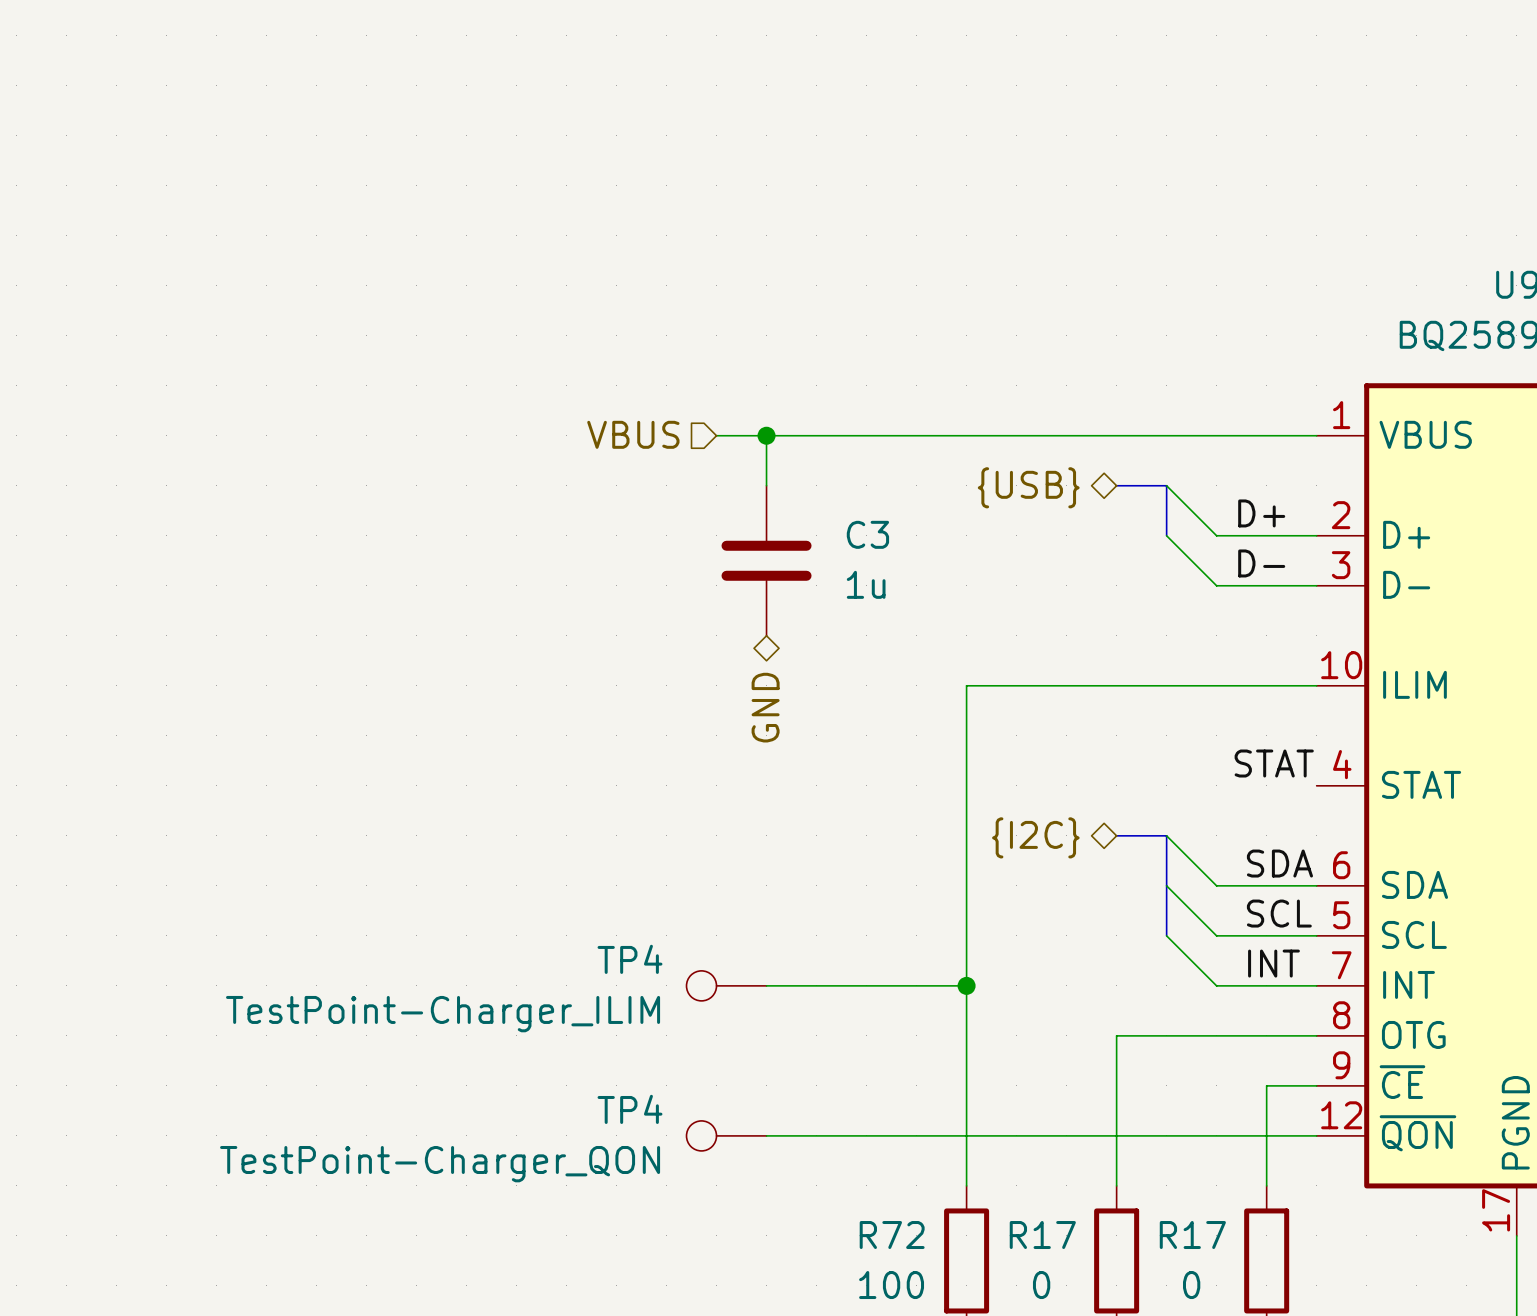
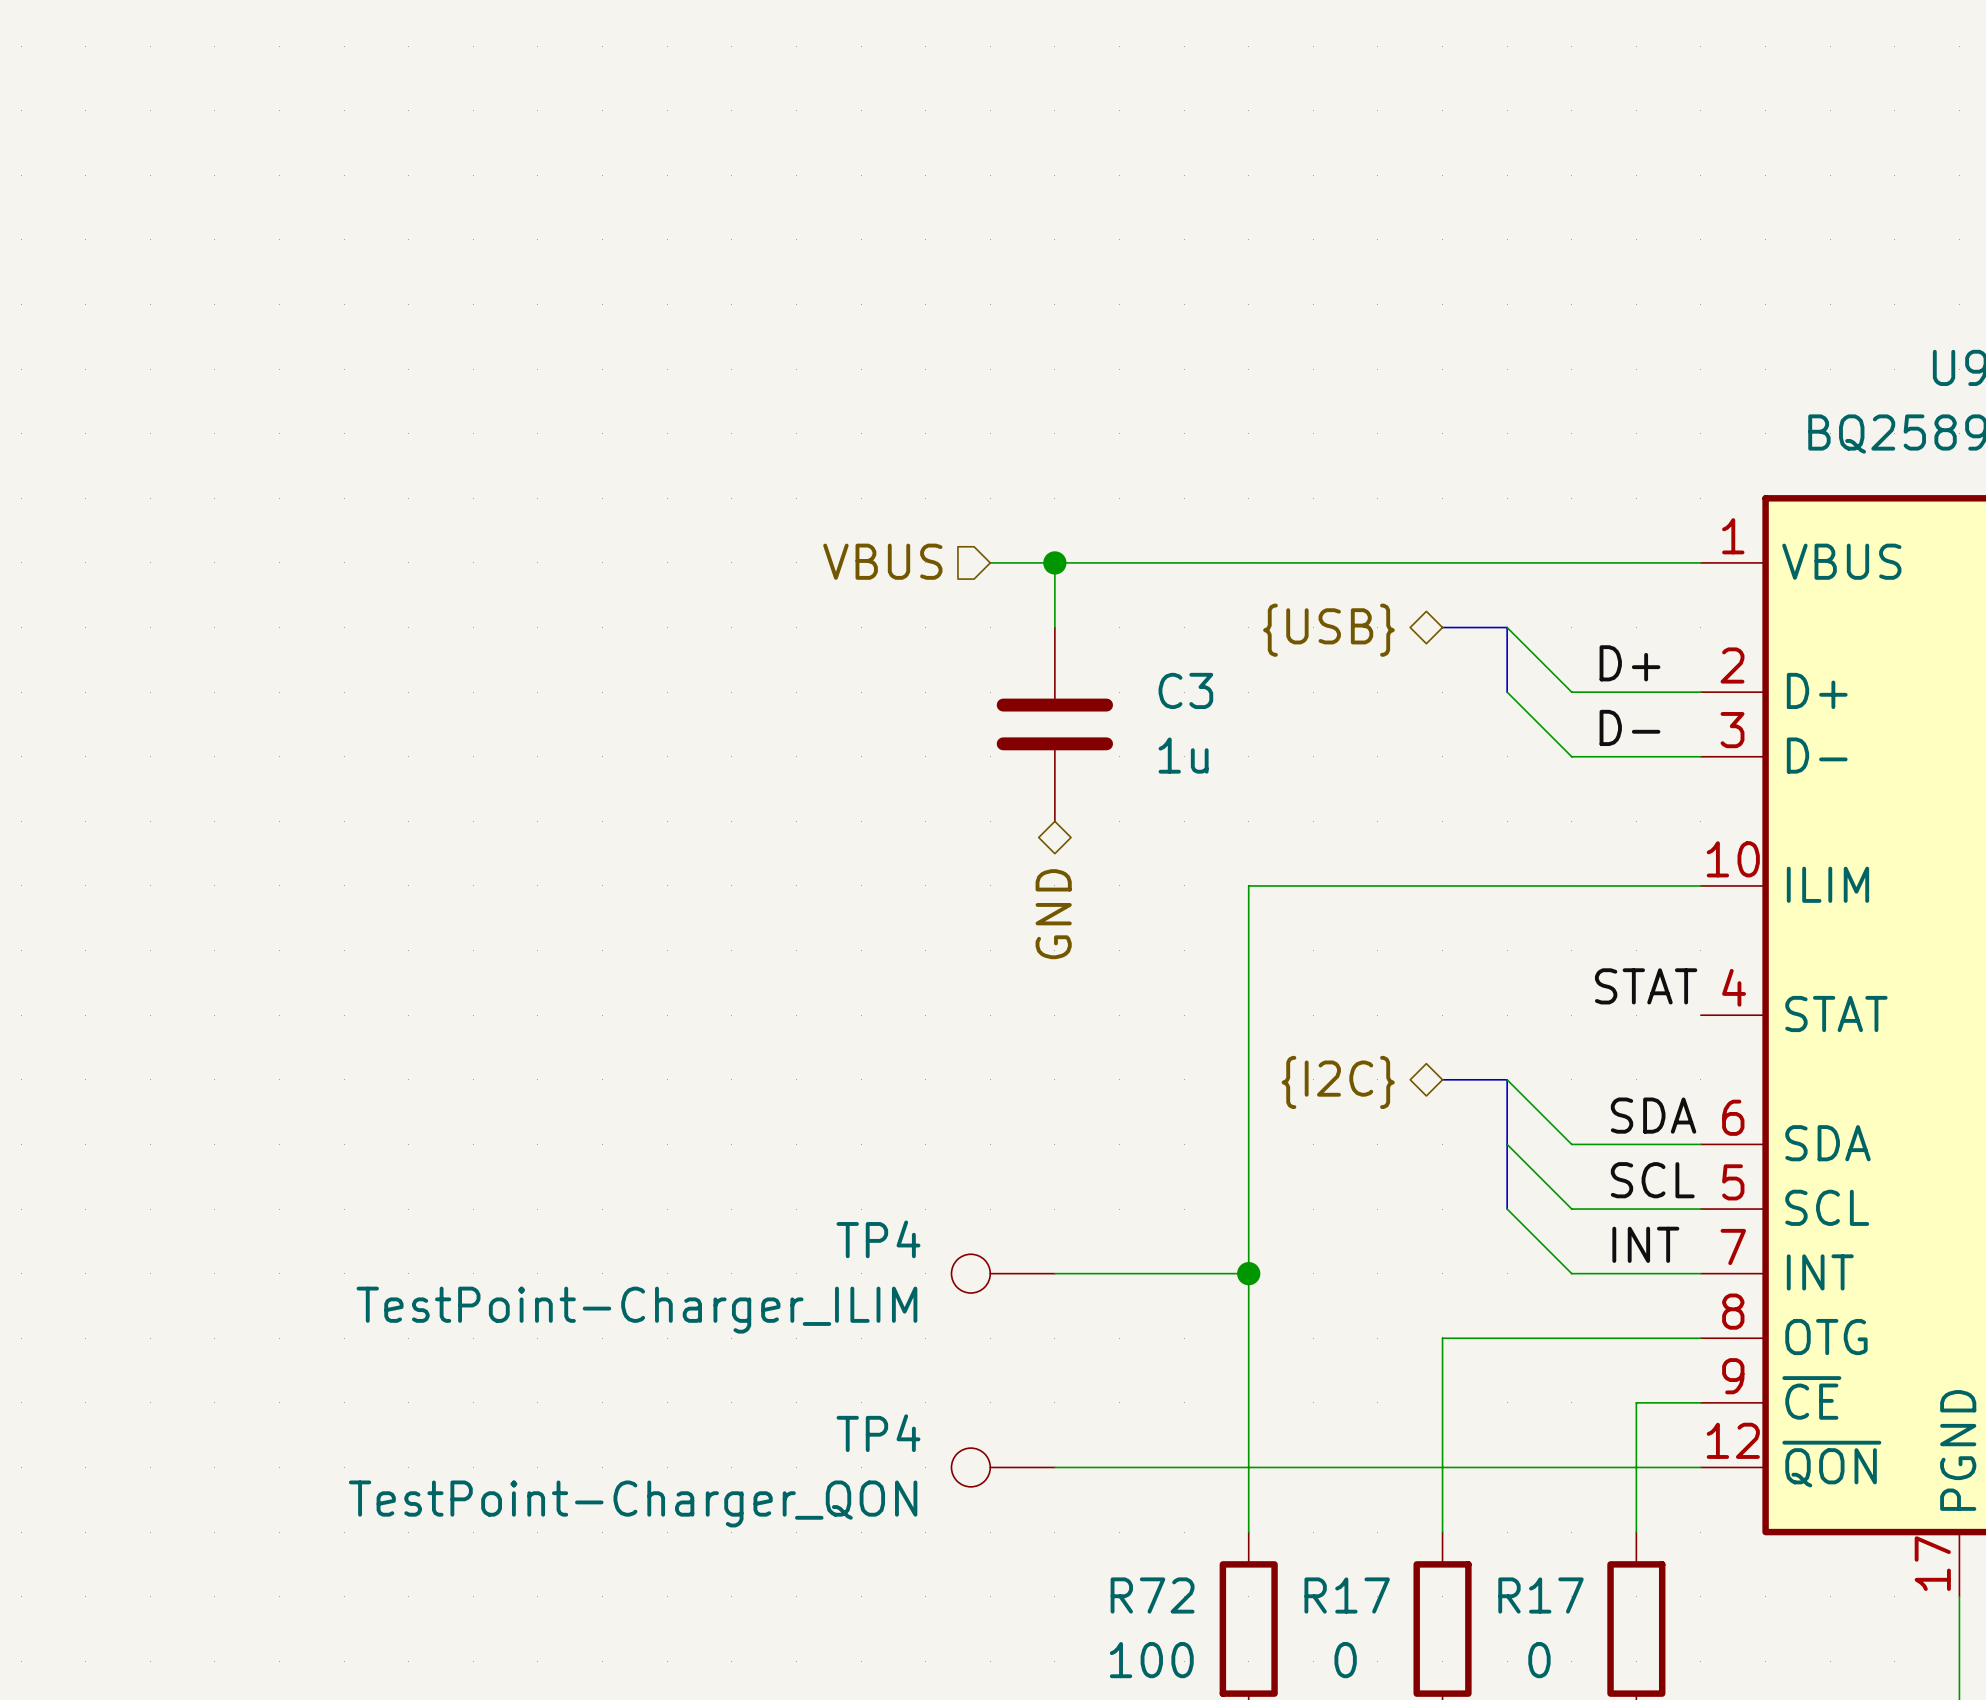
hierarchical label position: VBUS (633, 434) -> VBUS (882, 561)
wire: (716, 435) (766, 435) (766, 485) -> none
junction position: (766, 435) -> (1054, 562)
wire: none -> (1054, 562) (1054, 627)
C3 position: (766, 560) -> (1054, 724)
hierarchical label position: GND (765, 707) -> GND (1053, 914)
TP4 position: (726, 985) -> (1003, 1273)
TP4 position: (726, 1135) -> (1003, 1467)

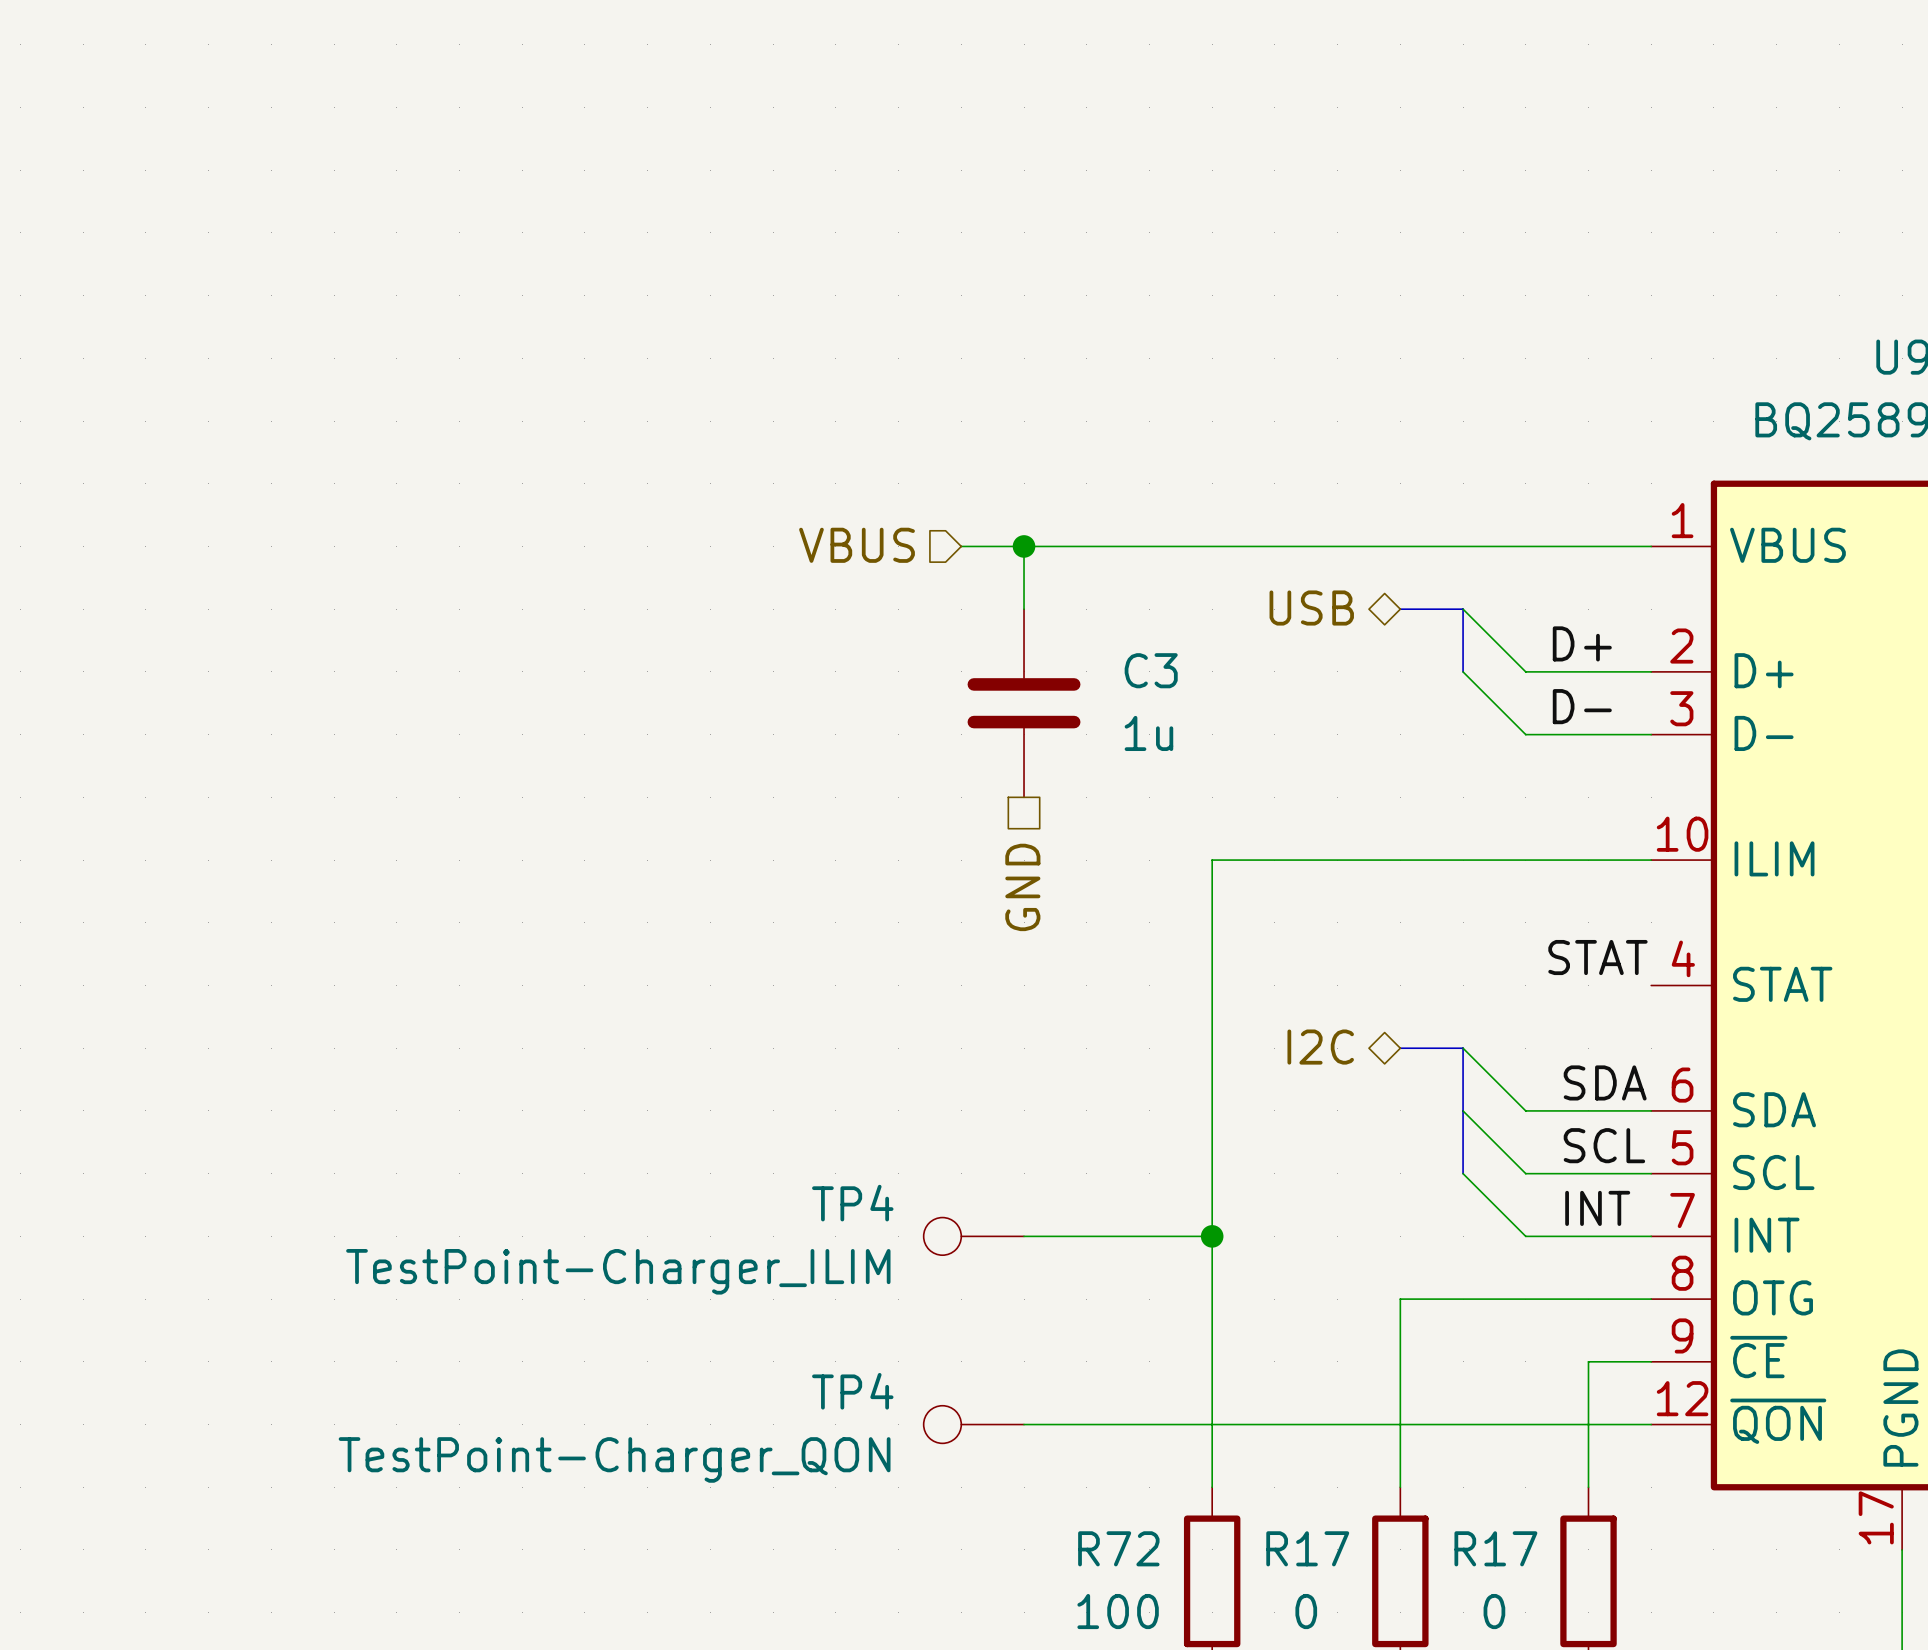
hierarchical label: {USB} (1328, 630) -> USB (1311, 608)
hierarchical label shape: bidirectional (1053, 914) -> passive (1022, 887)
hierarchical label: {I2C} (1338, 1082) -> I2C (1320, 1047)

